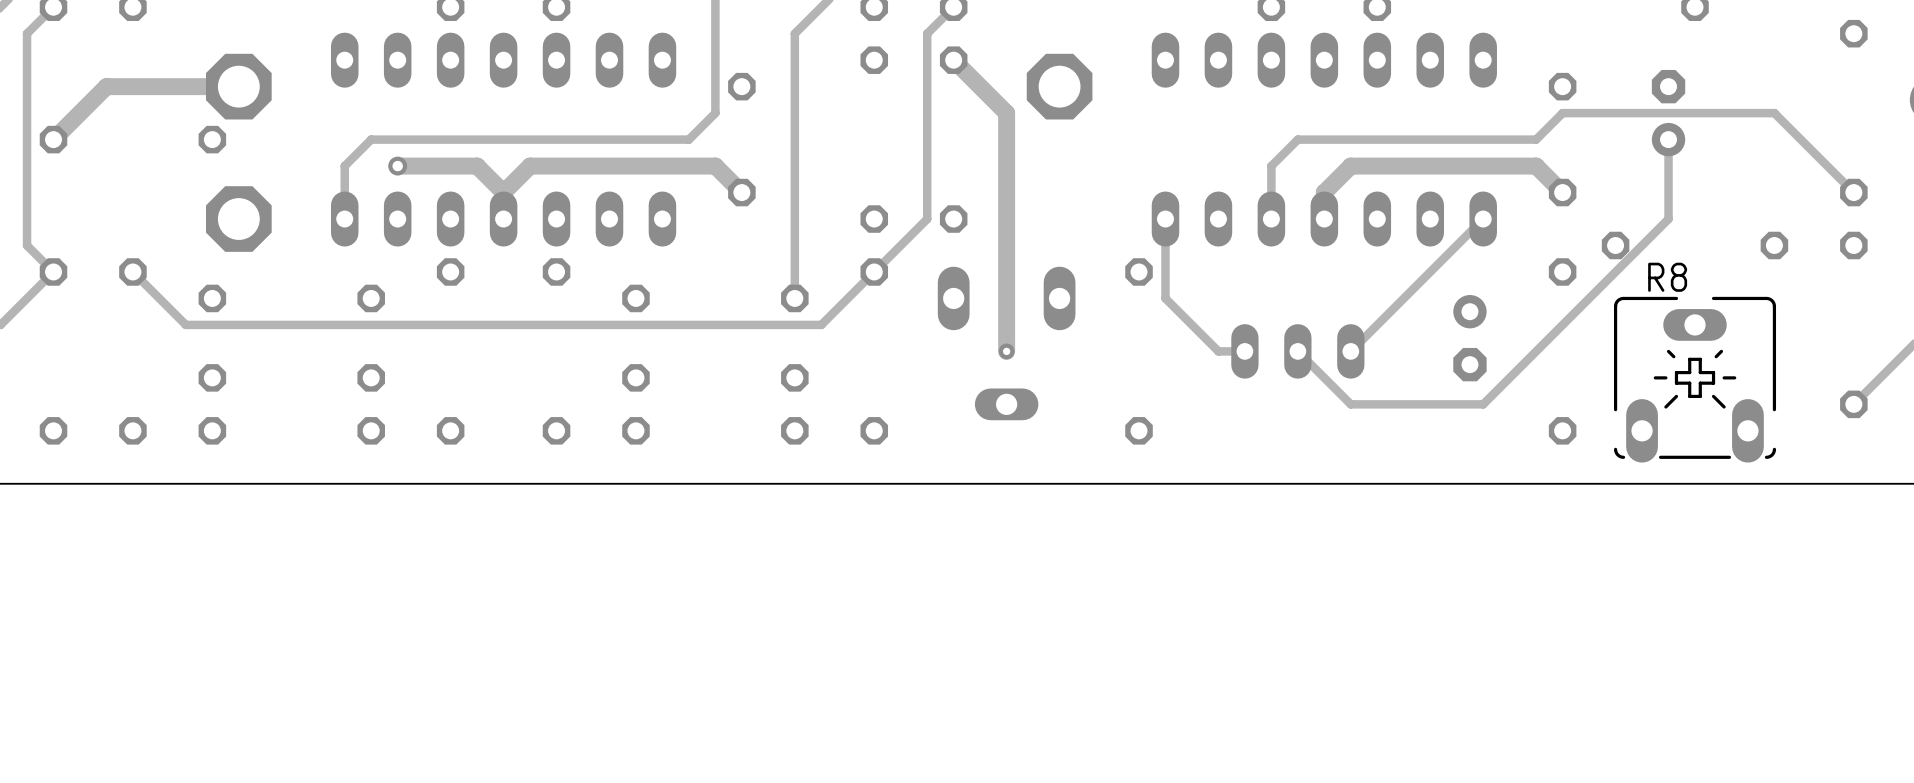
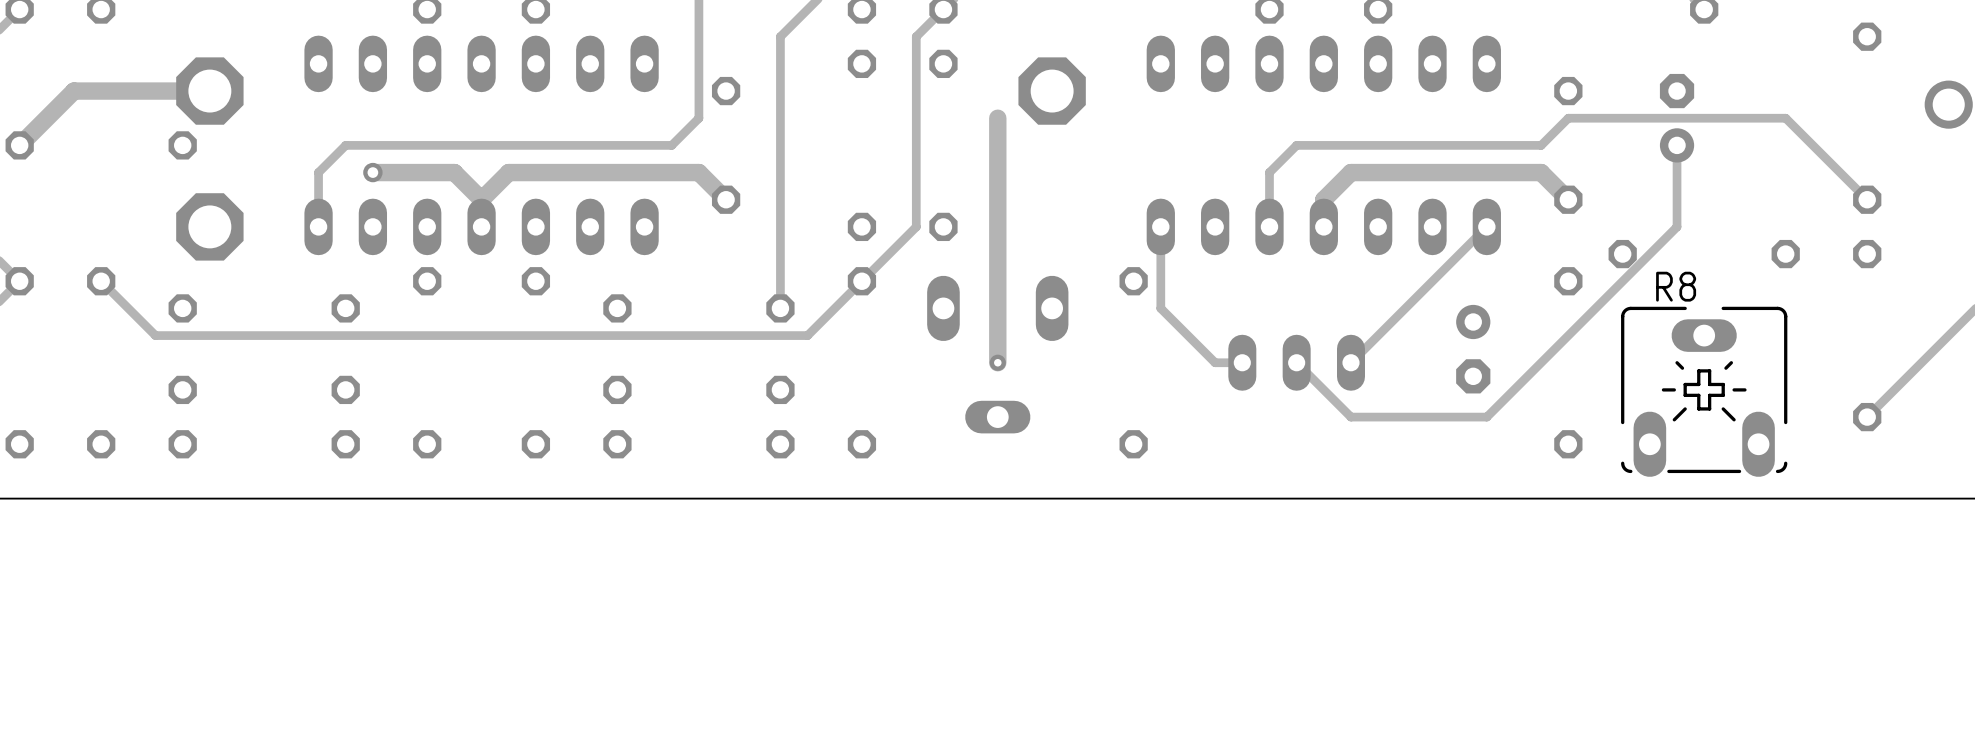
track: (953, 60) (1006, 113) -> none

